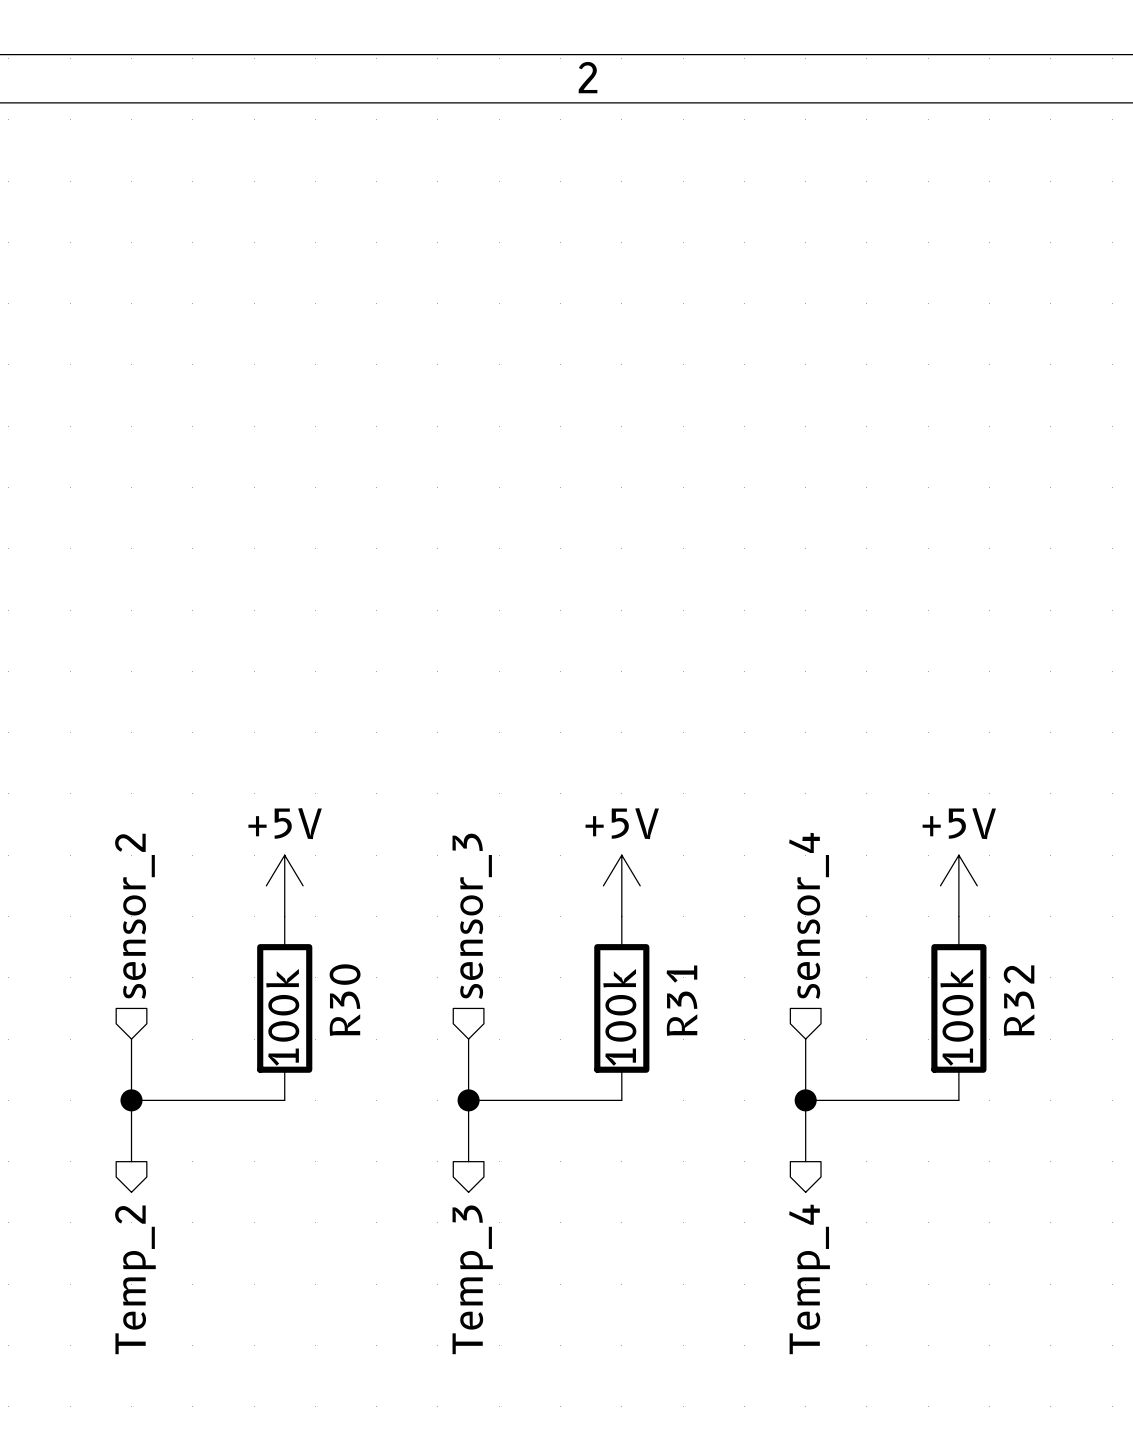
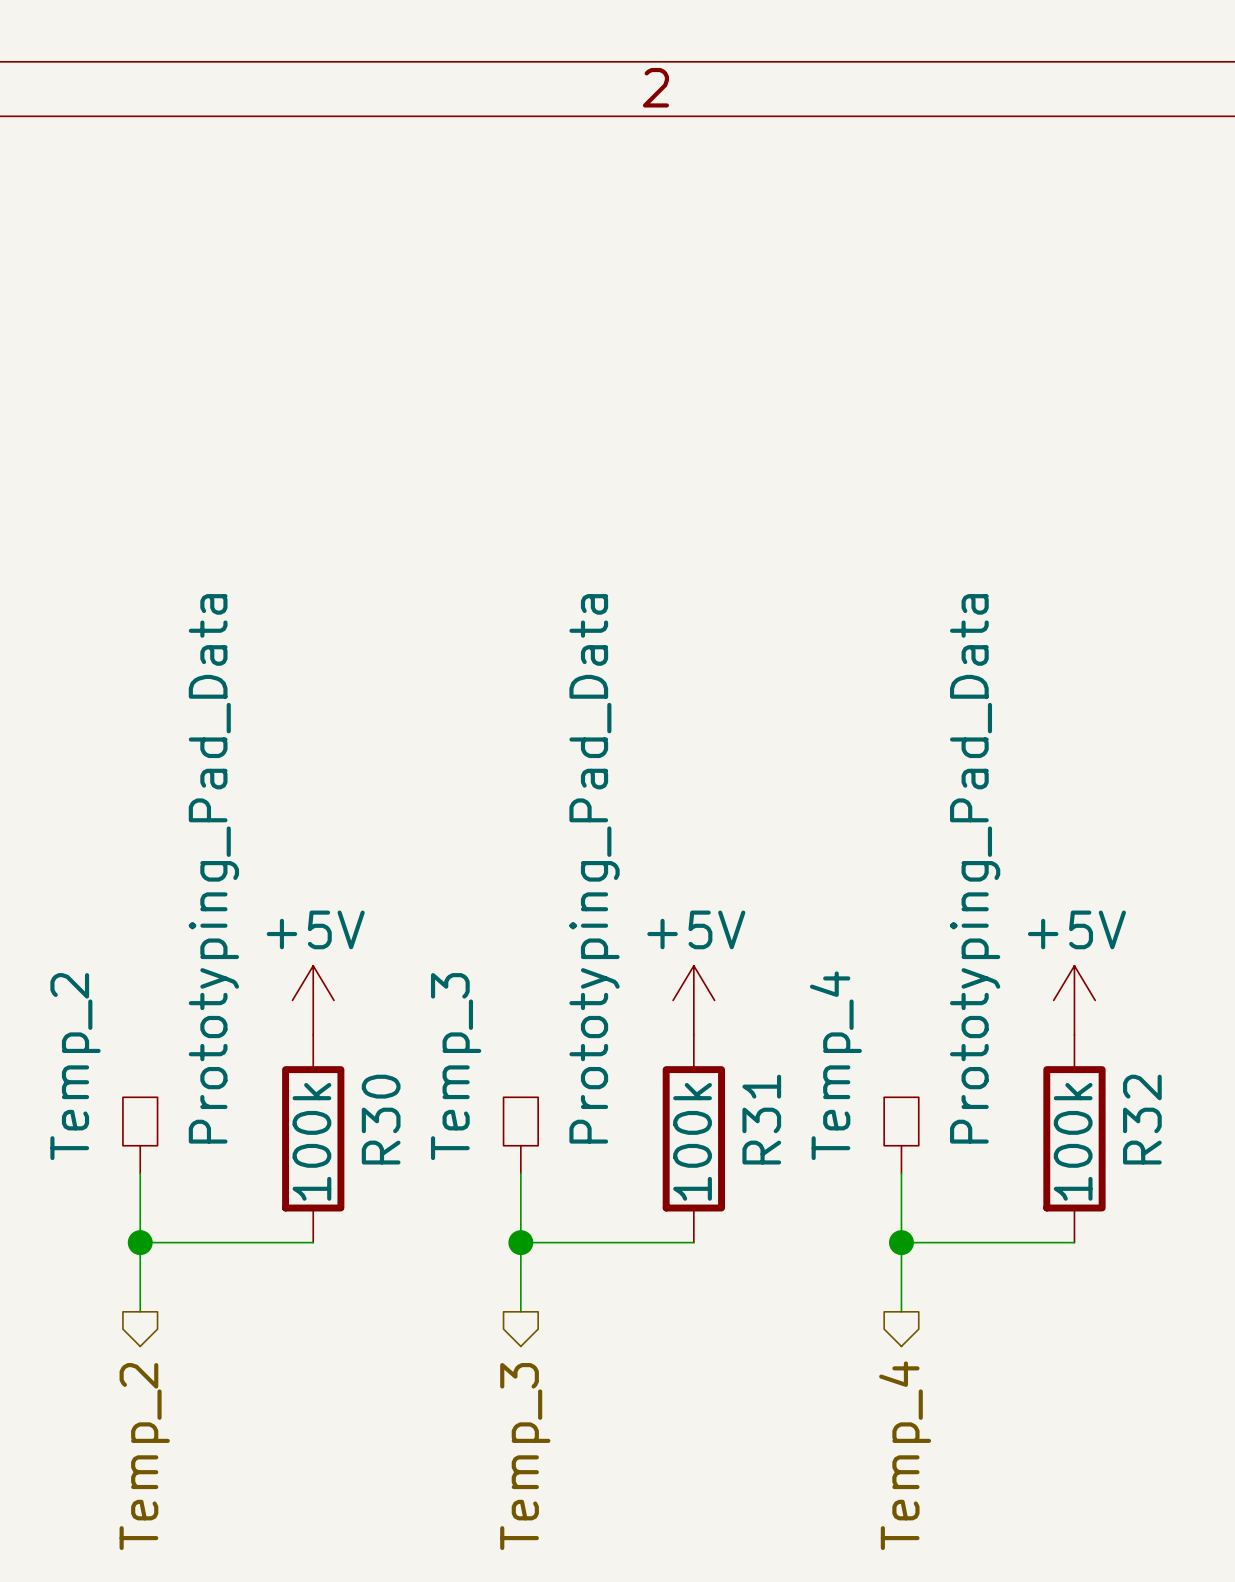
hierarchical label: sensor_4 (809, 915) -> none
hierarchical label: sensor_2 (134, 916) -> none
hierarchical label: sensor_3 (472, 916) -> none
Temp_2: none -> Prototyping_Pad_Data (140, 1135)
Temp_3: none -> Prototyping_Pad_Data (520, 1135)
Temp_4: none -> Prototyping_Pad_Data (901, 1135)

